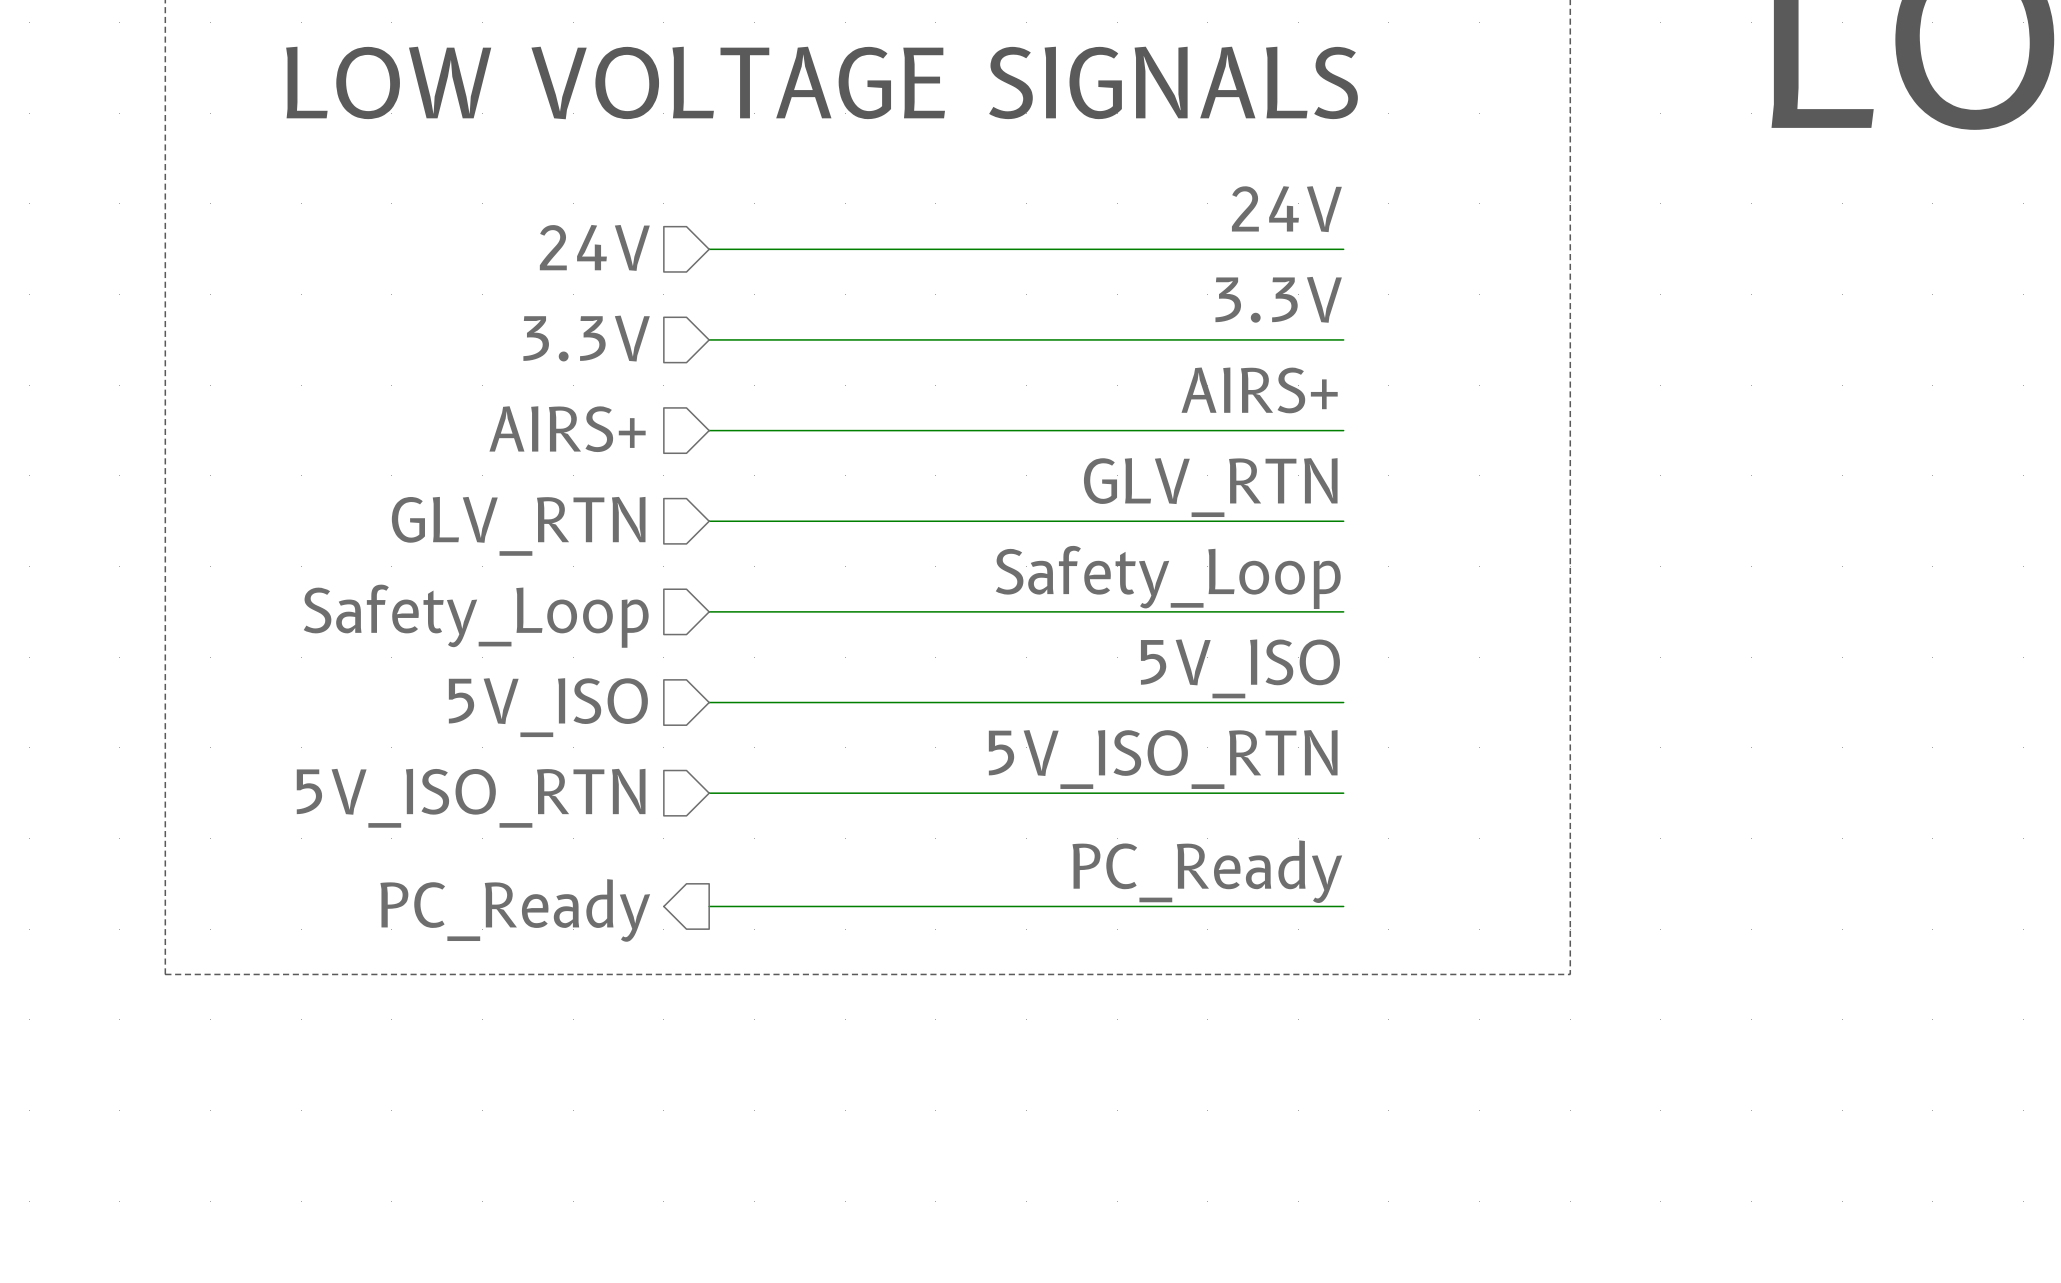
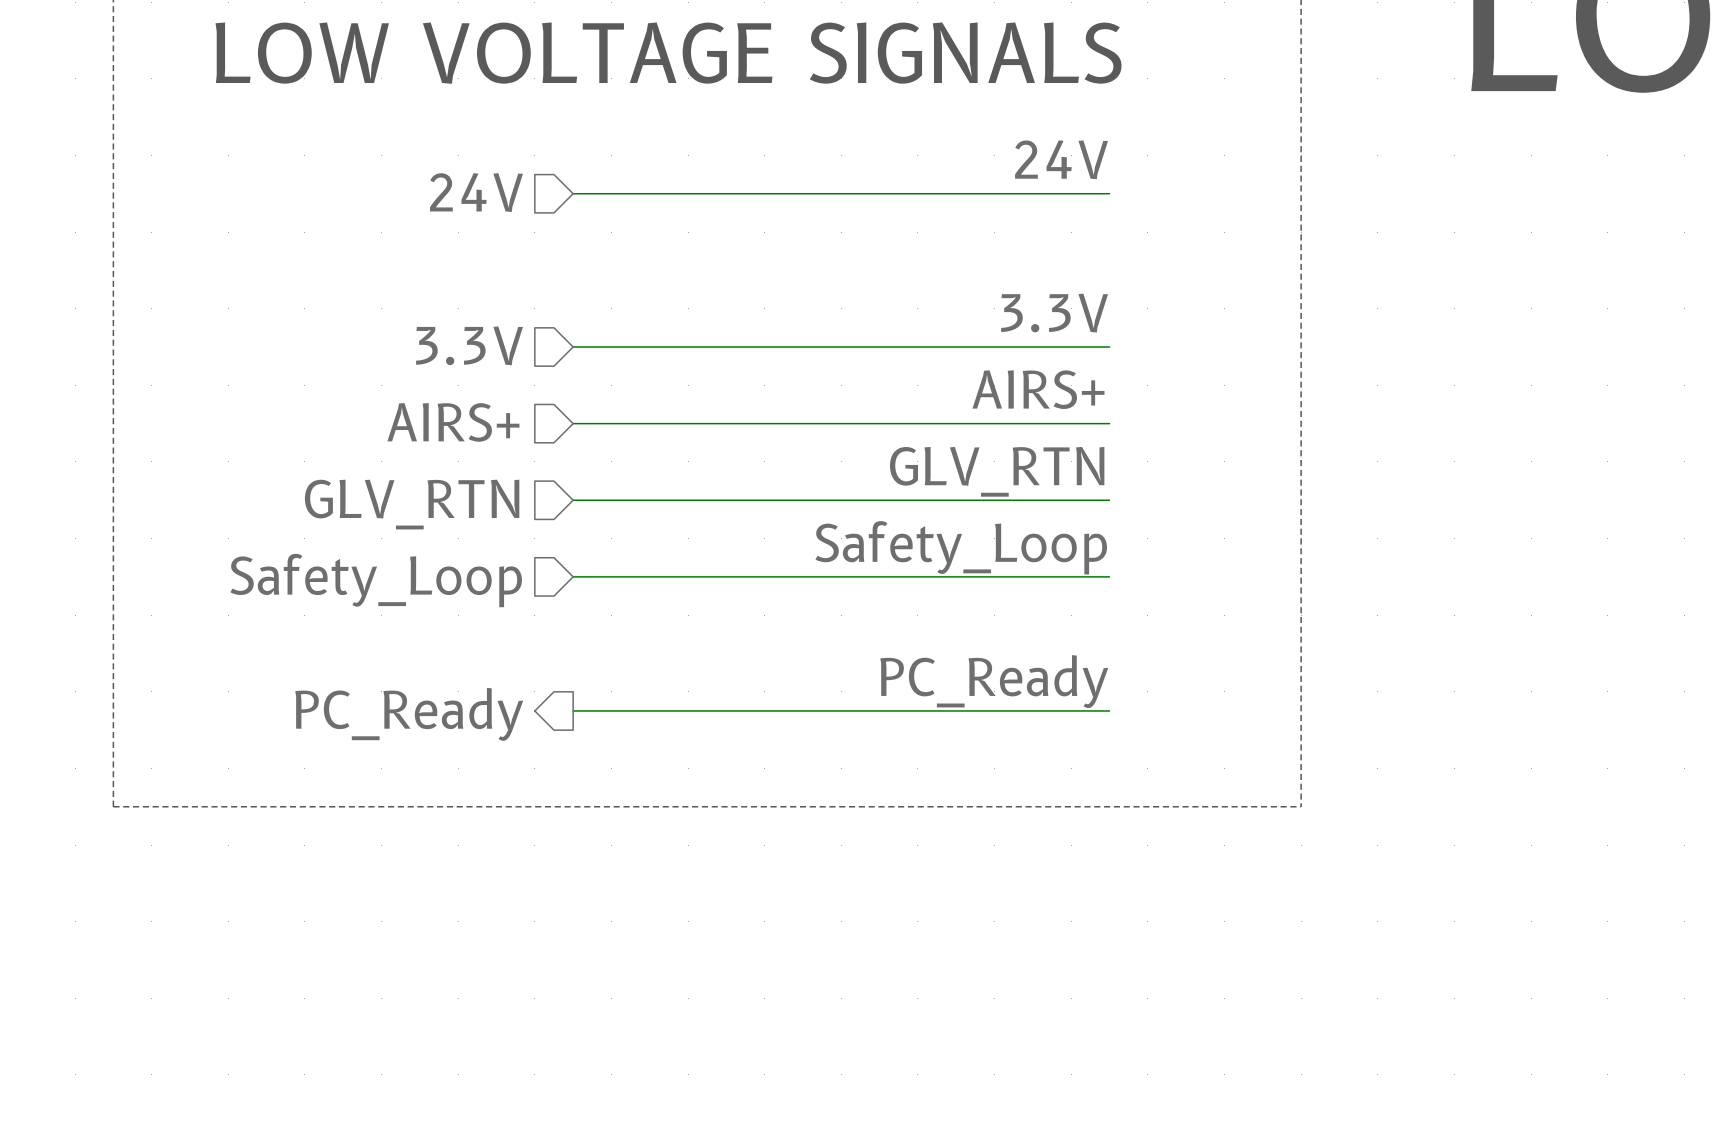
label: 3.3V (1278, 299) -> none
hierarchical label: 3.3V (586, 338) -> none
wire: (709, 339) (1343, 339) -> none
label: AIRS+ (1259, 390) -> 3.3V (1054, 313)
hierarchical label: AIRS+ (567, 429) -> 3.3V (469, 345)
label: GLV_RTN (1210, 487) -> AIRS+ (1038, 389)
hierarchical label: GLV_RTN (518, 526) -> AIRS+ (453, 422)
label: Safety_Loop (1168, 577) -> GLV_RTN (997, 471)
hierarchical label: Safety_Loop (476, 616) -> GLV_RTN (412, 504)
label: 5V_ISO (1240, 668) -> Safety_Loop (961, 547)
hierarchical label: 5V_ISO (548, 707) -> Safety_Loop (376, 580)
label: 5V_ISO_RTN (1163, 759) -> none
wire: (709, 793) (1343, 793) -> none
hierarchical label: 5V_ISO_RTN (471, 798) -> none
label position: PC_Ready (1207, 871) -> PC_Ready (994, 681)
wire: (709, 906) (1343, 906) -> (573, 710) (1109, 710)
hierarchical label position: PC_Ready (515, 910) -> PC_Ready (409, 714)

